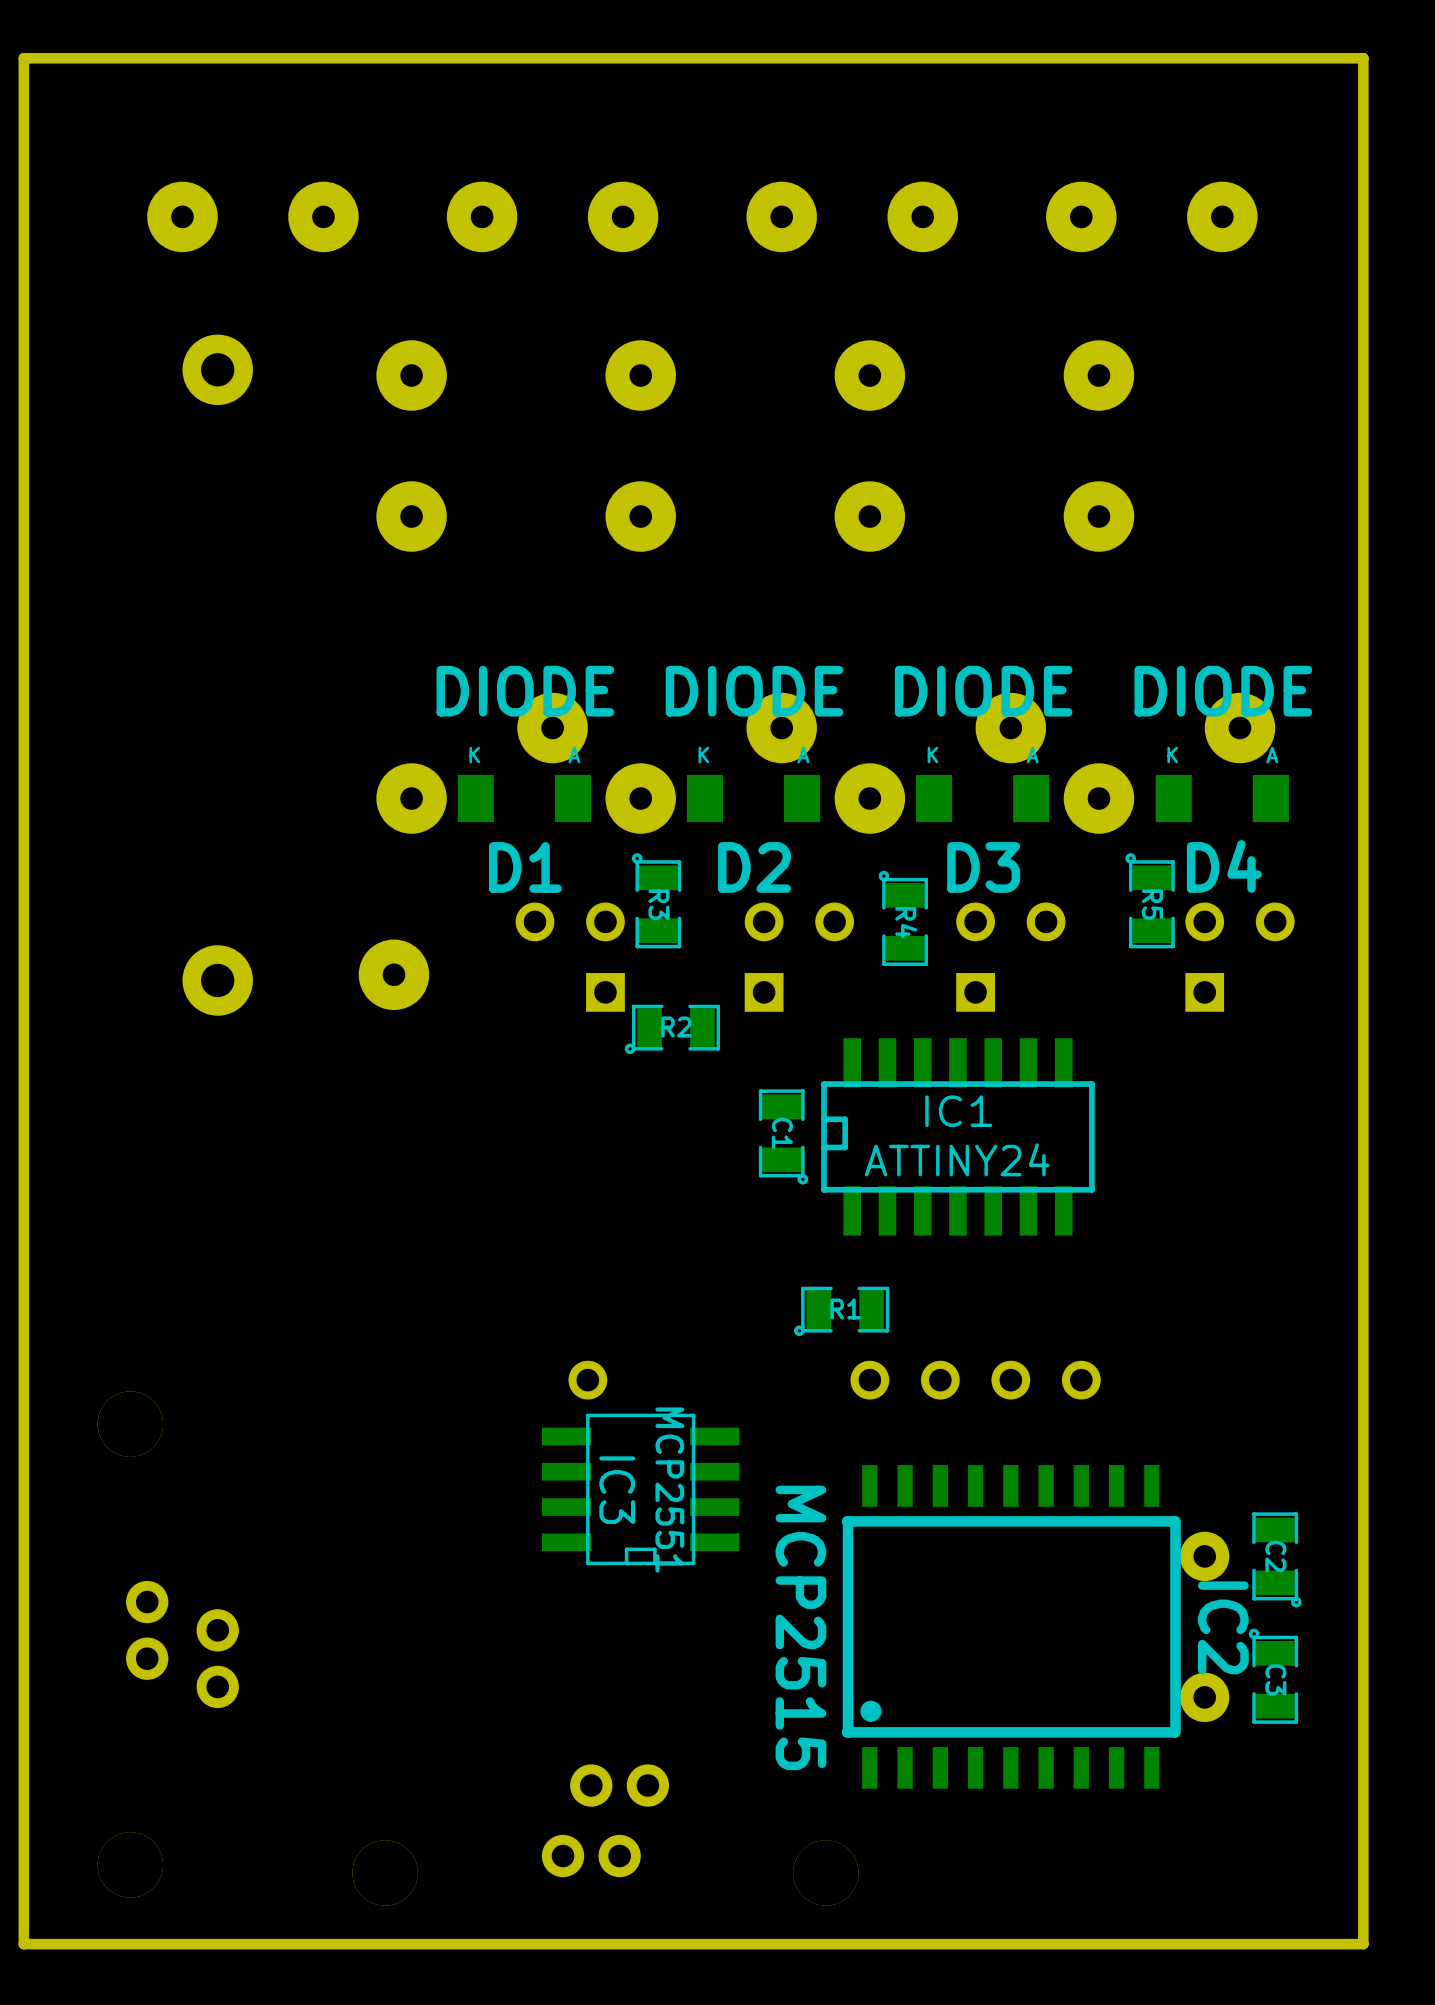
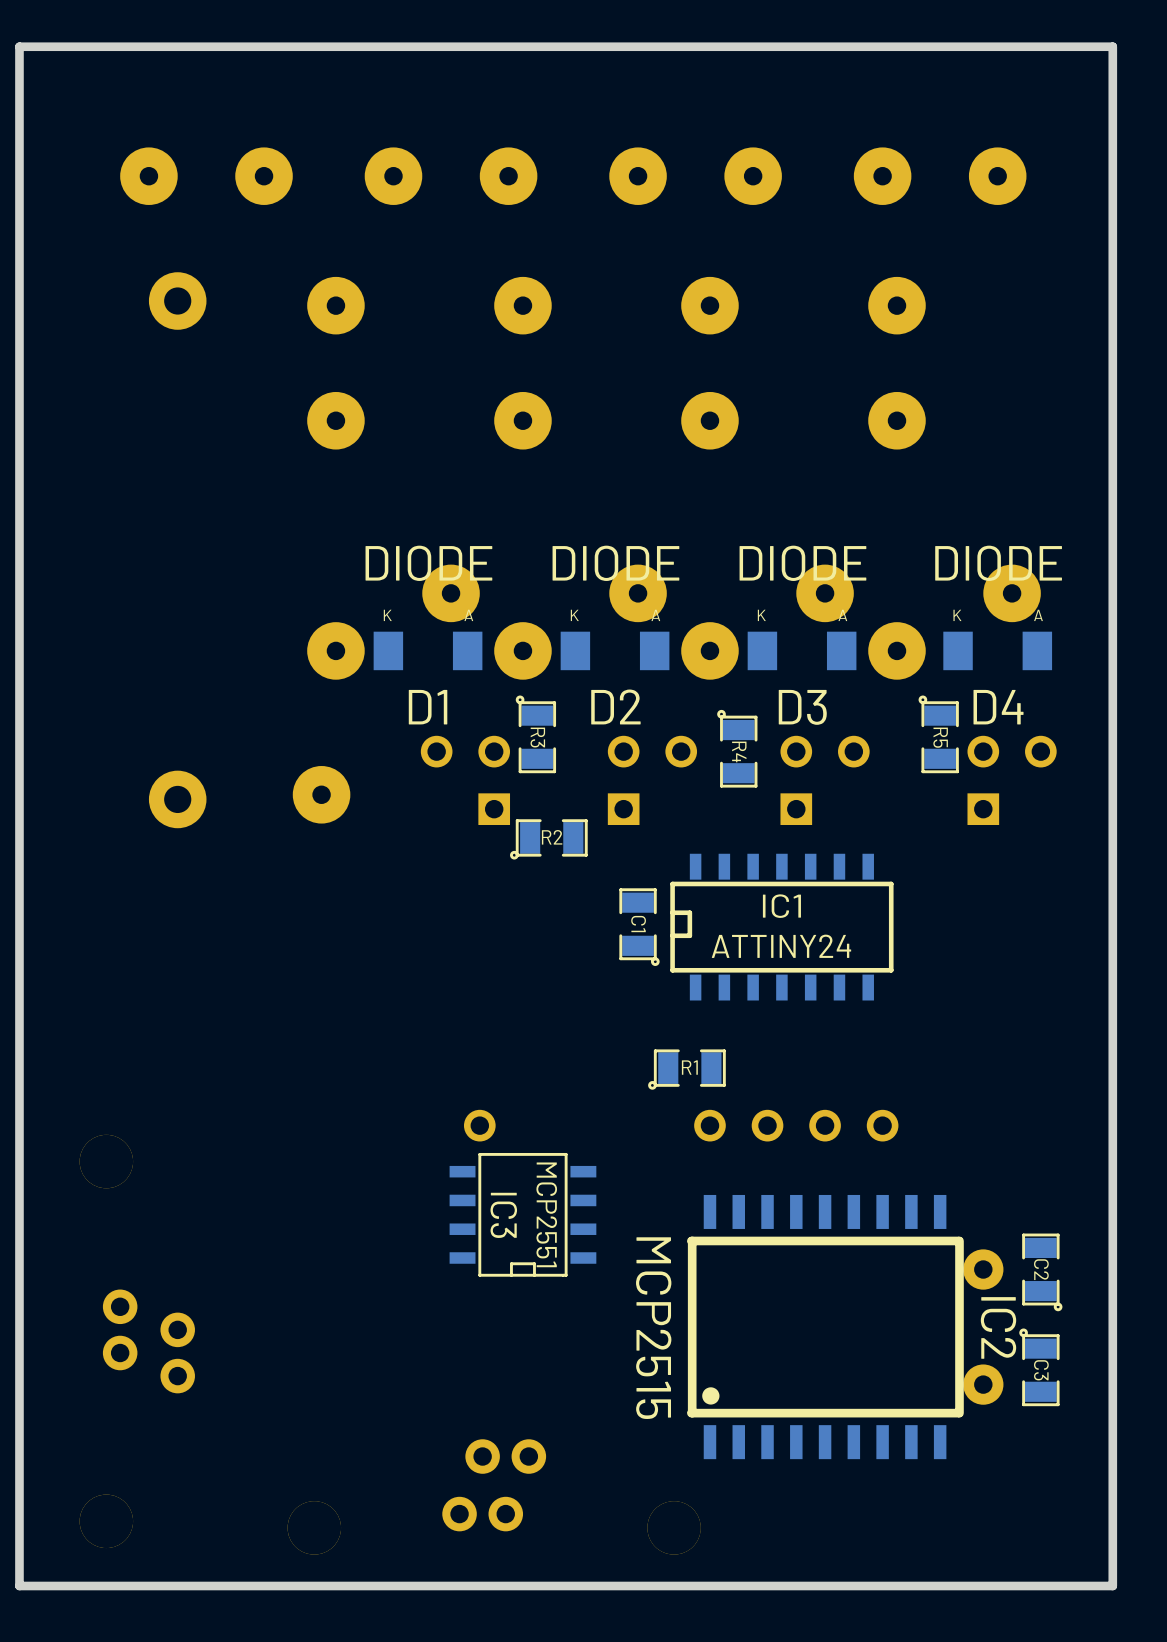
IC1 footprint: [821, 1038, 1095, 1236] -> [670, 853, 894, 1001]
IC3 footprint: [542, 1413, 740, 1566] -> [449, 1152, 597, 1277]

